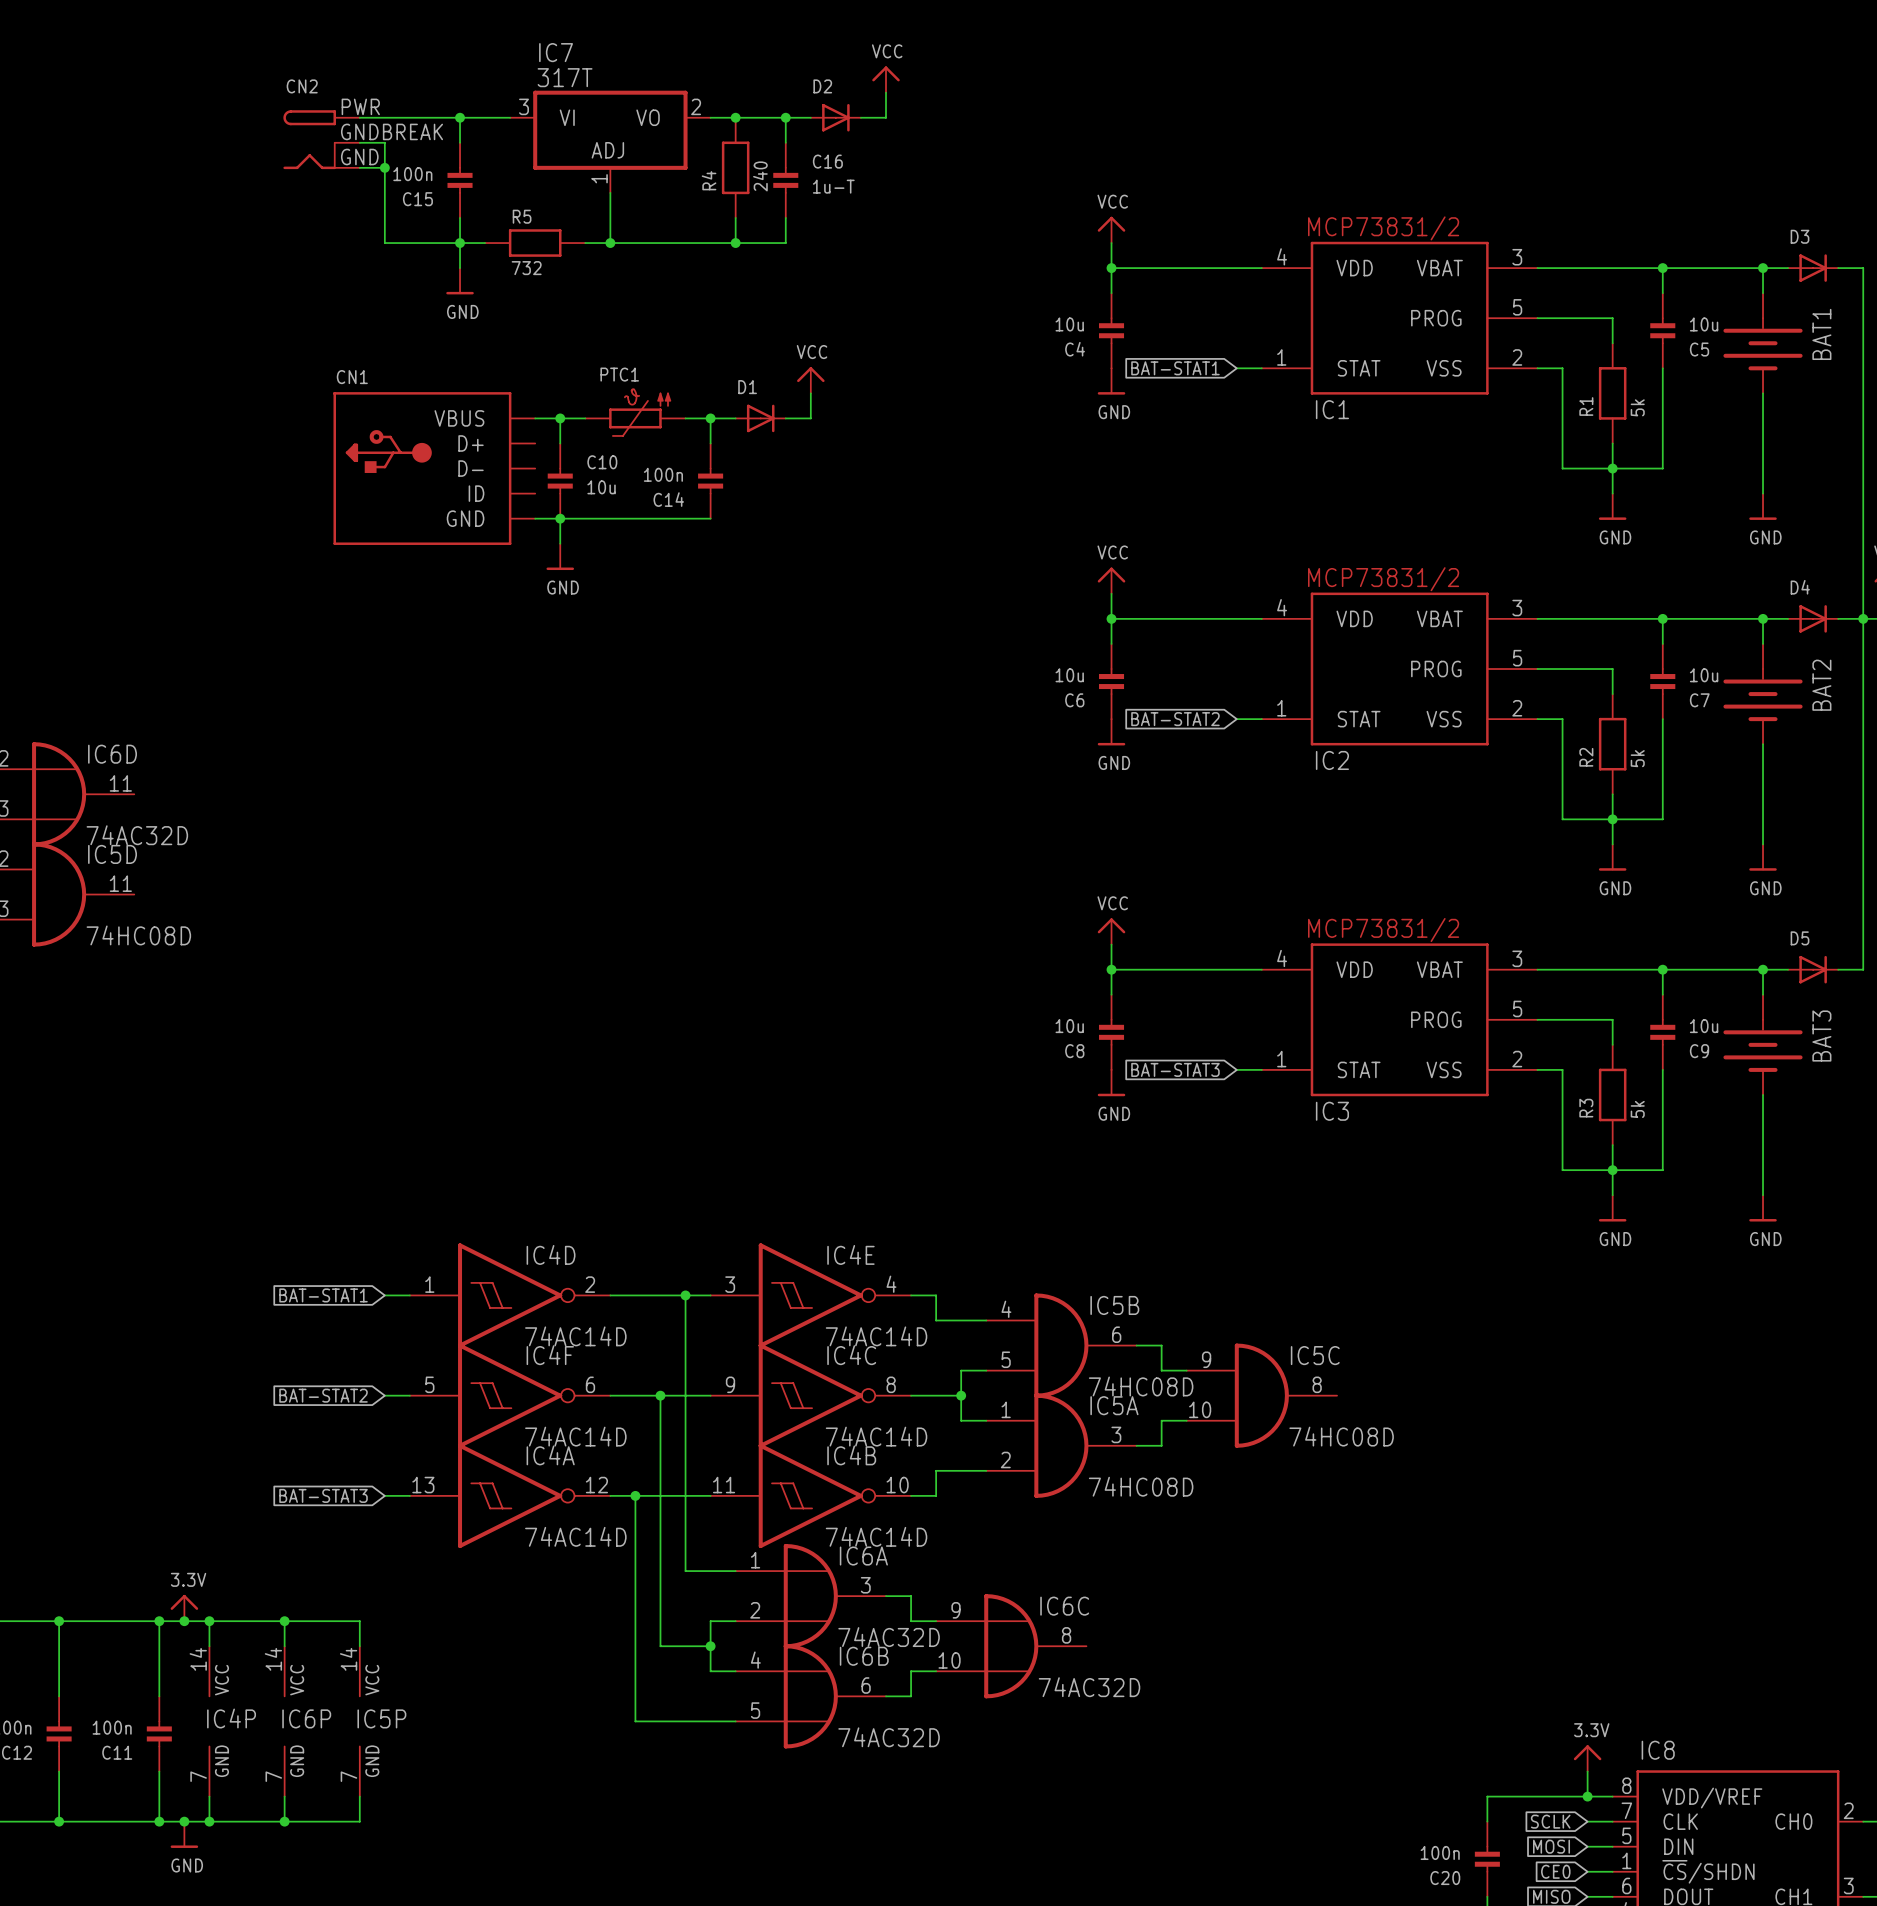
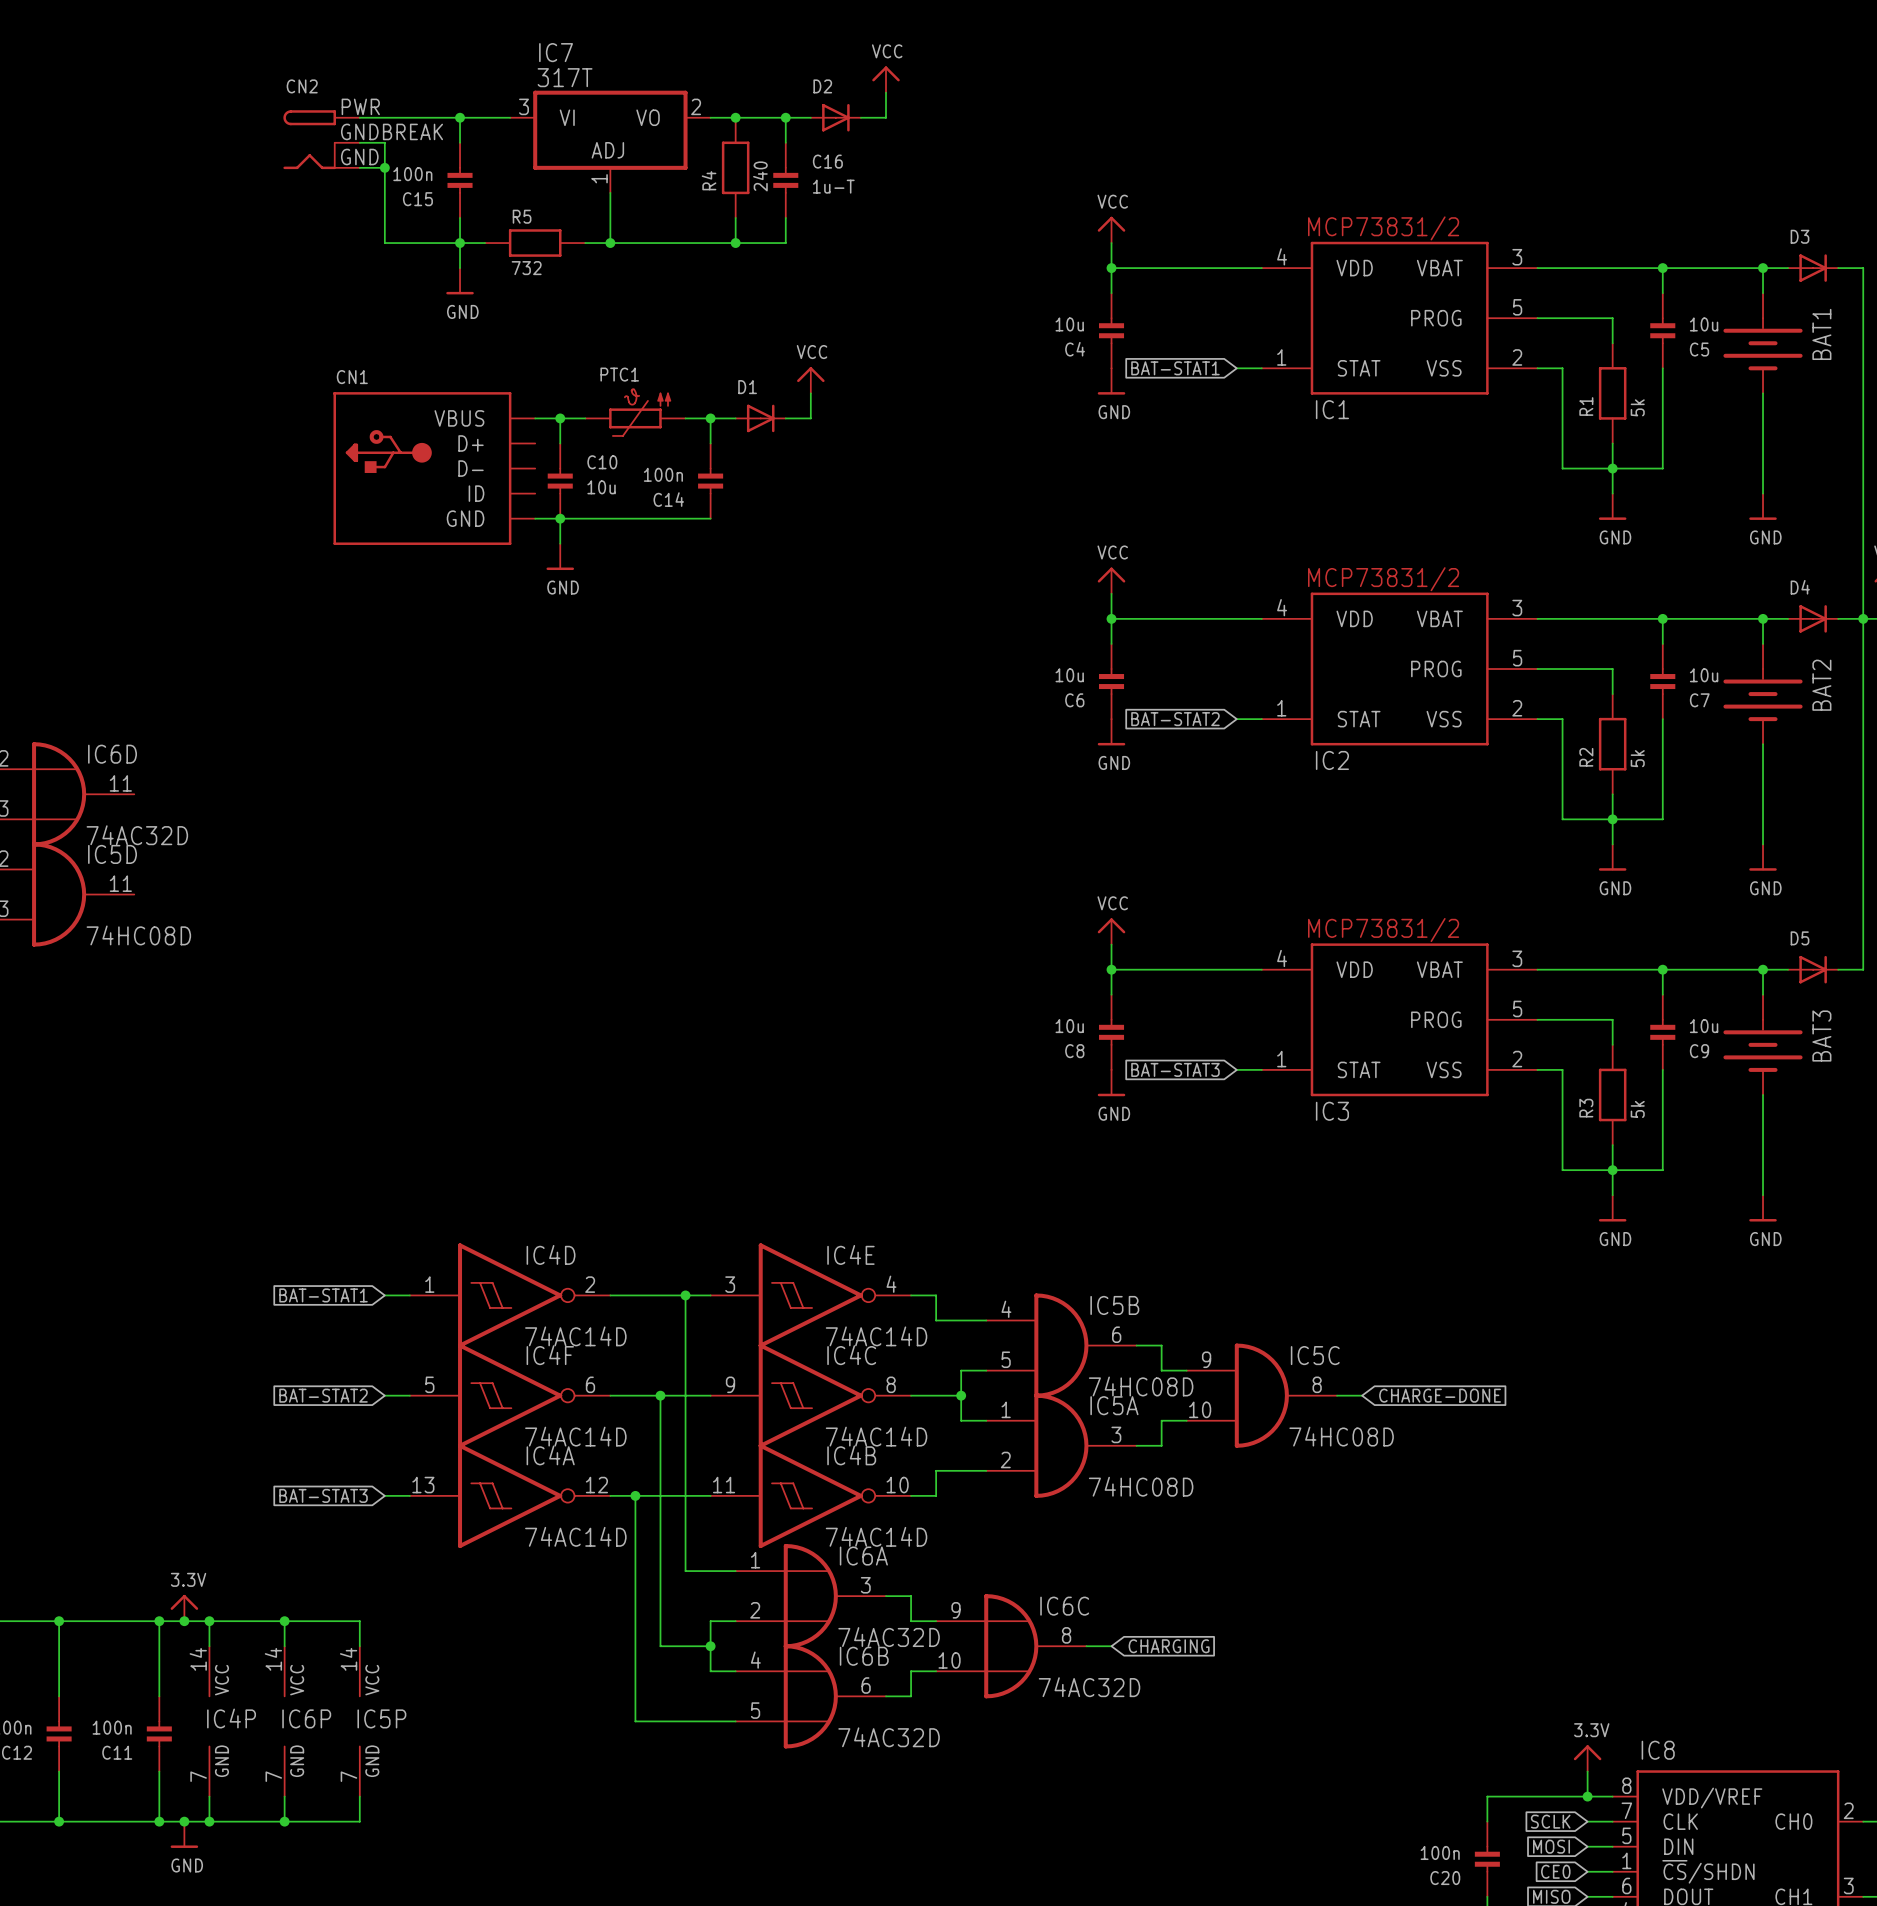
wire: none -> (1337, 1395) (1362, 1395)
global label: none -> CHARGE-DONE (1440, 1395)
wire: none -> (1086, 1646) (1111, 1646)
global label: none -> CHARGING (1169, 1646)

